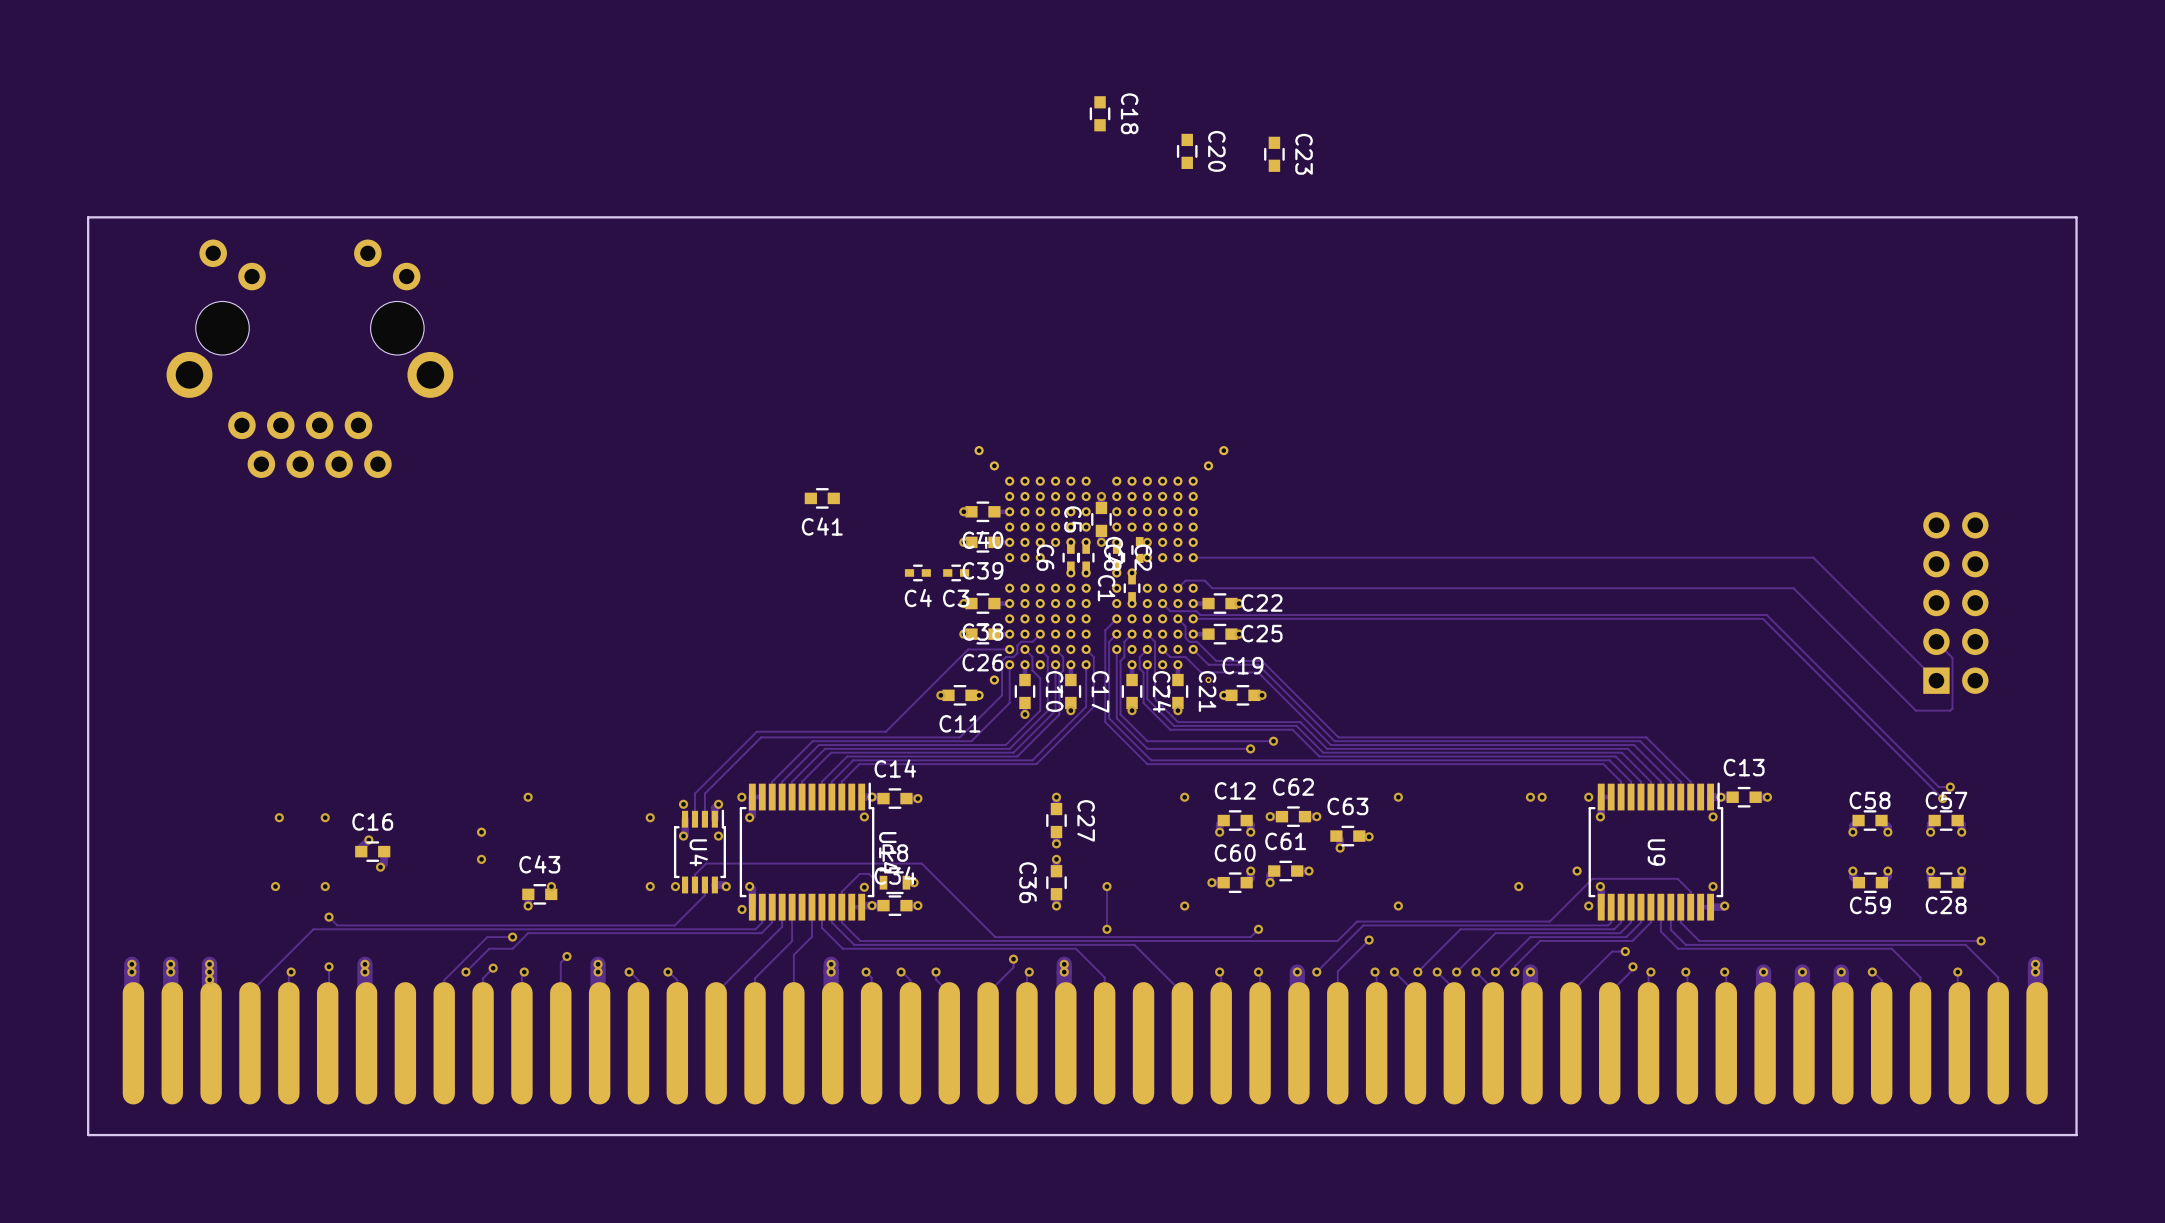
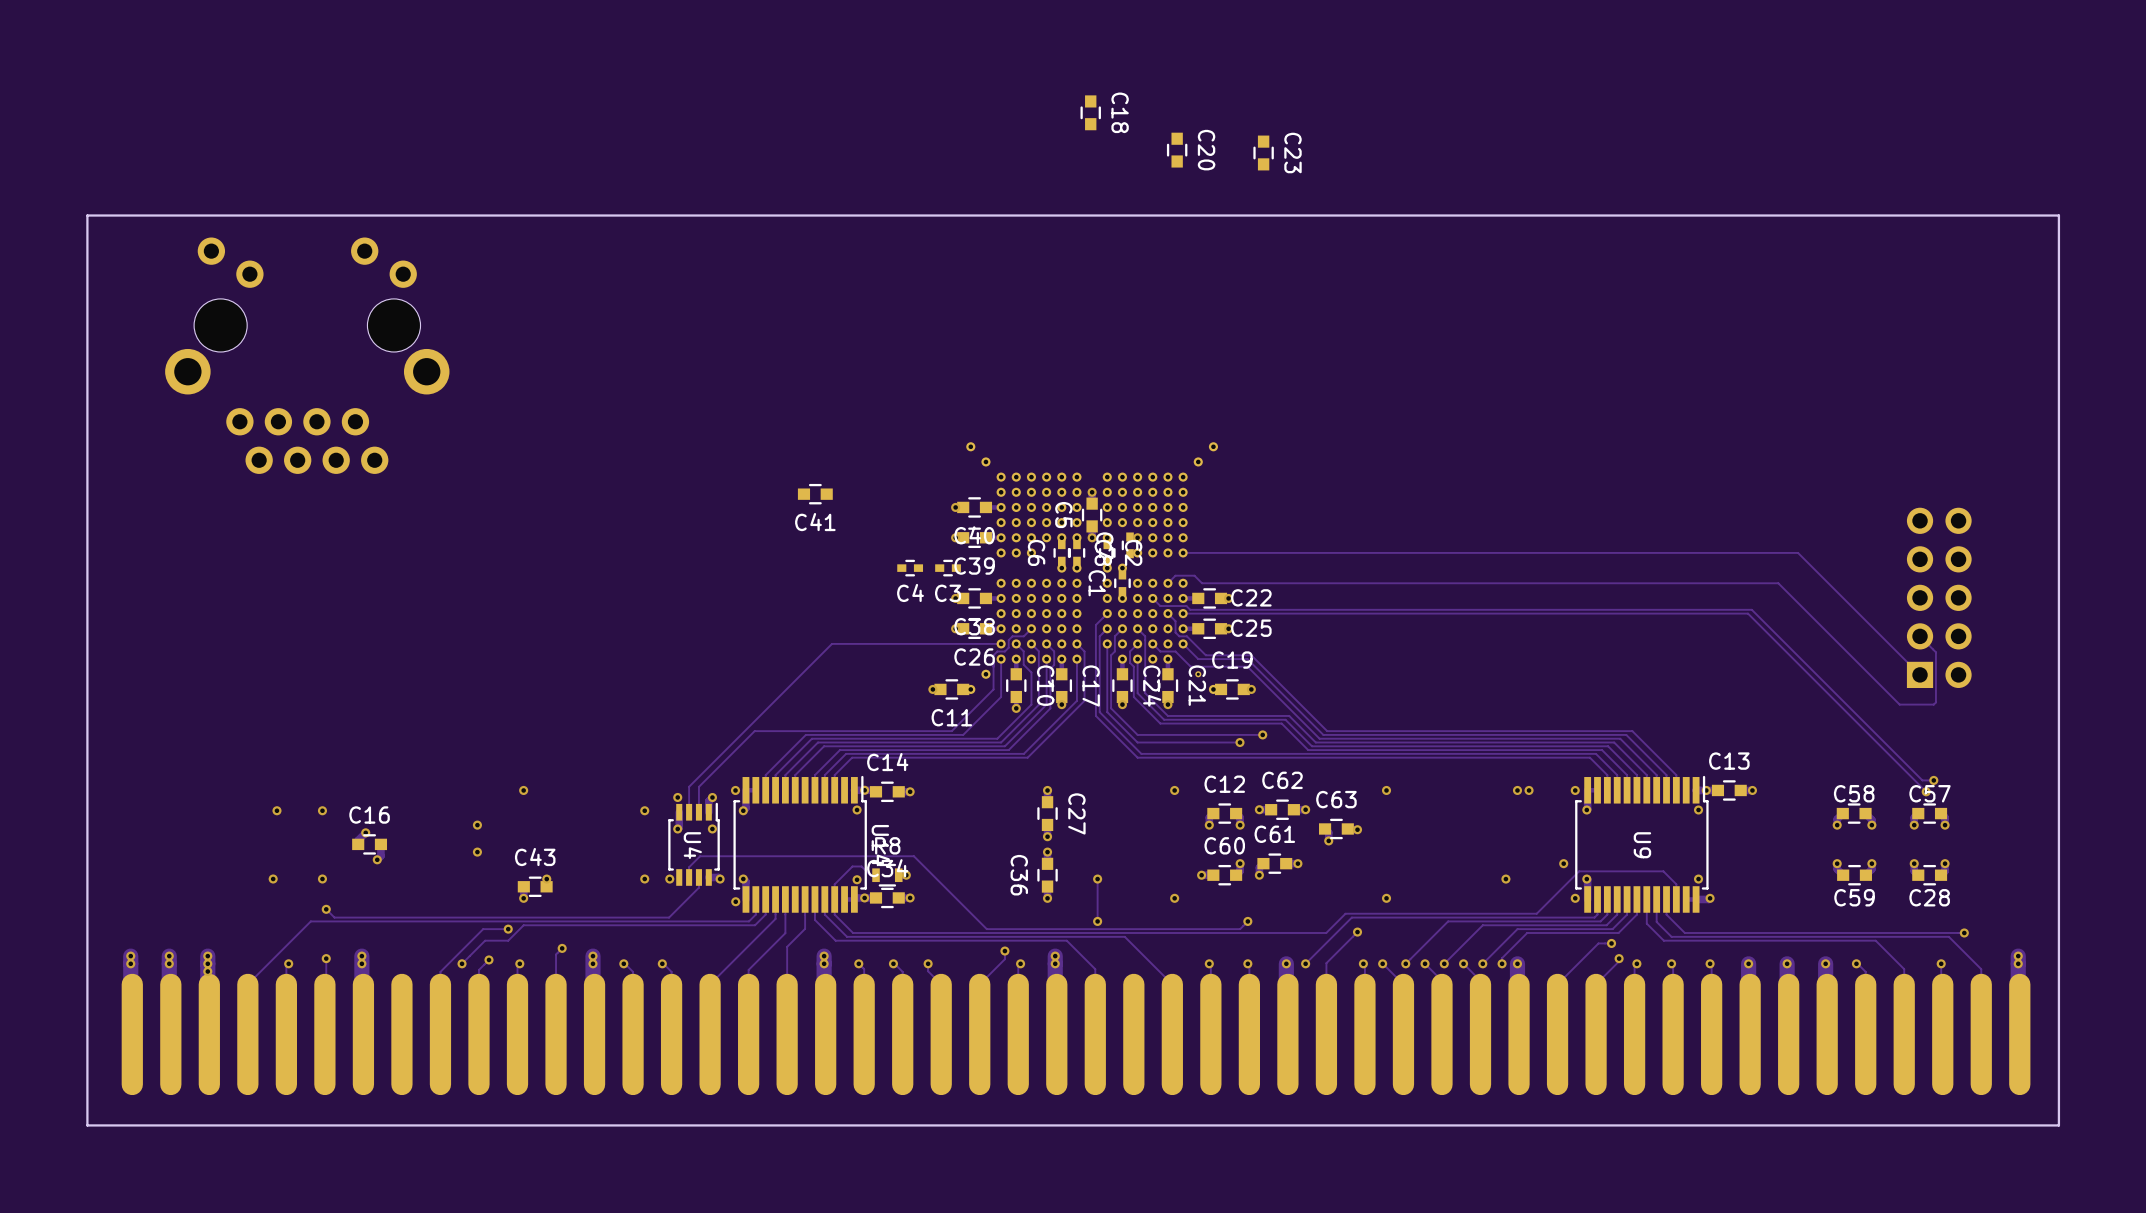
track: (968, 649) (885, 731) (756, 731) -> (959, 643) (831, 643) (750, 725)

